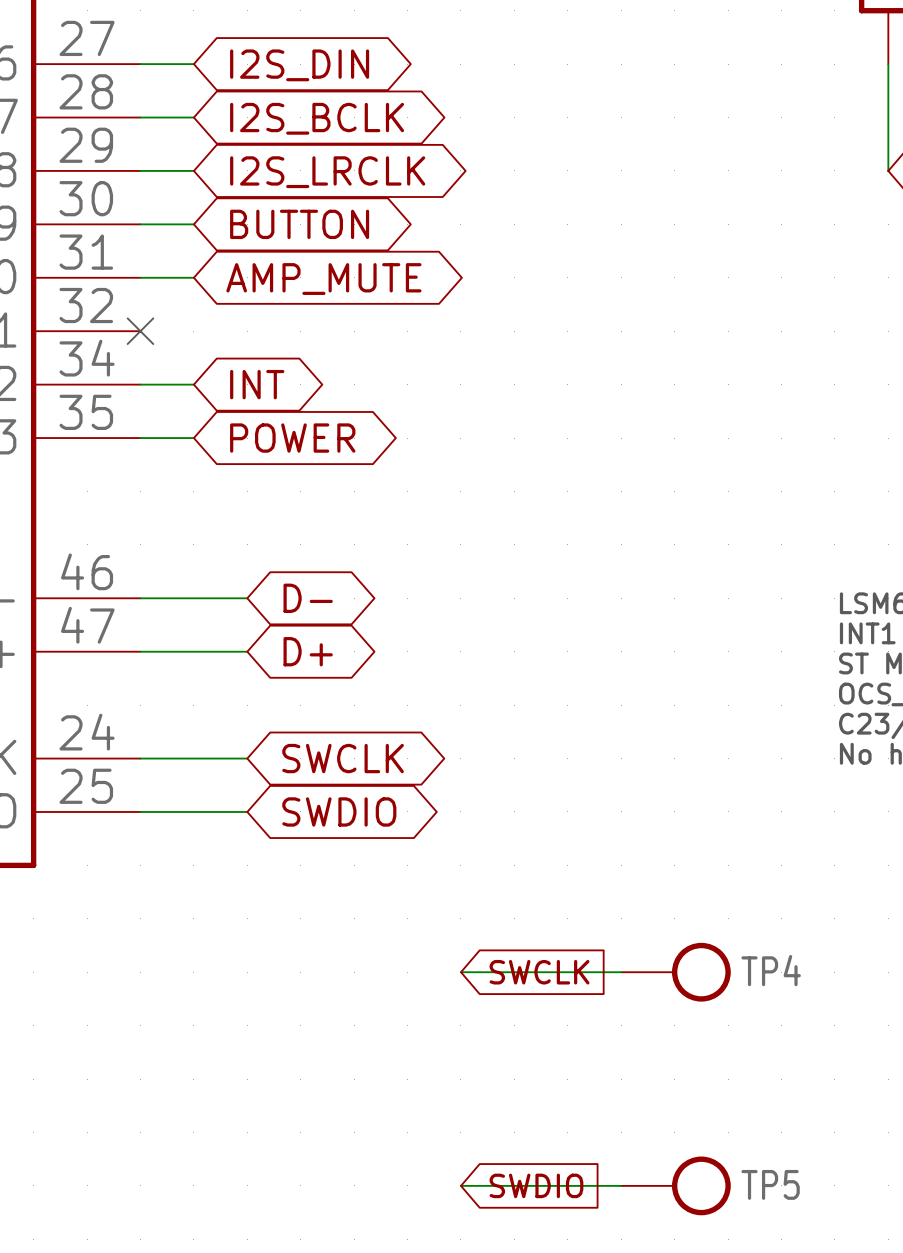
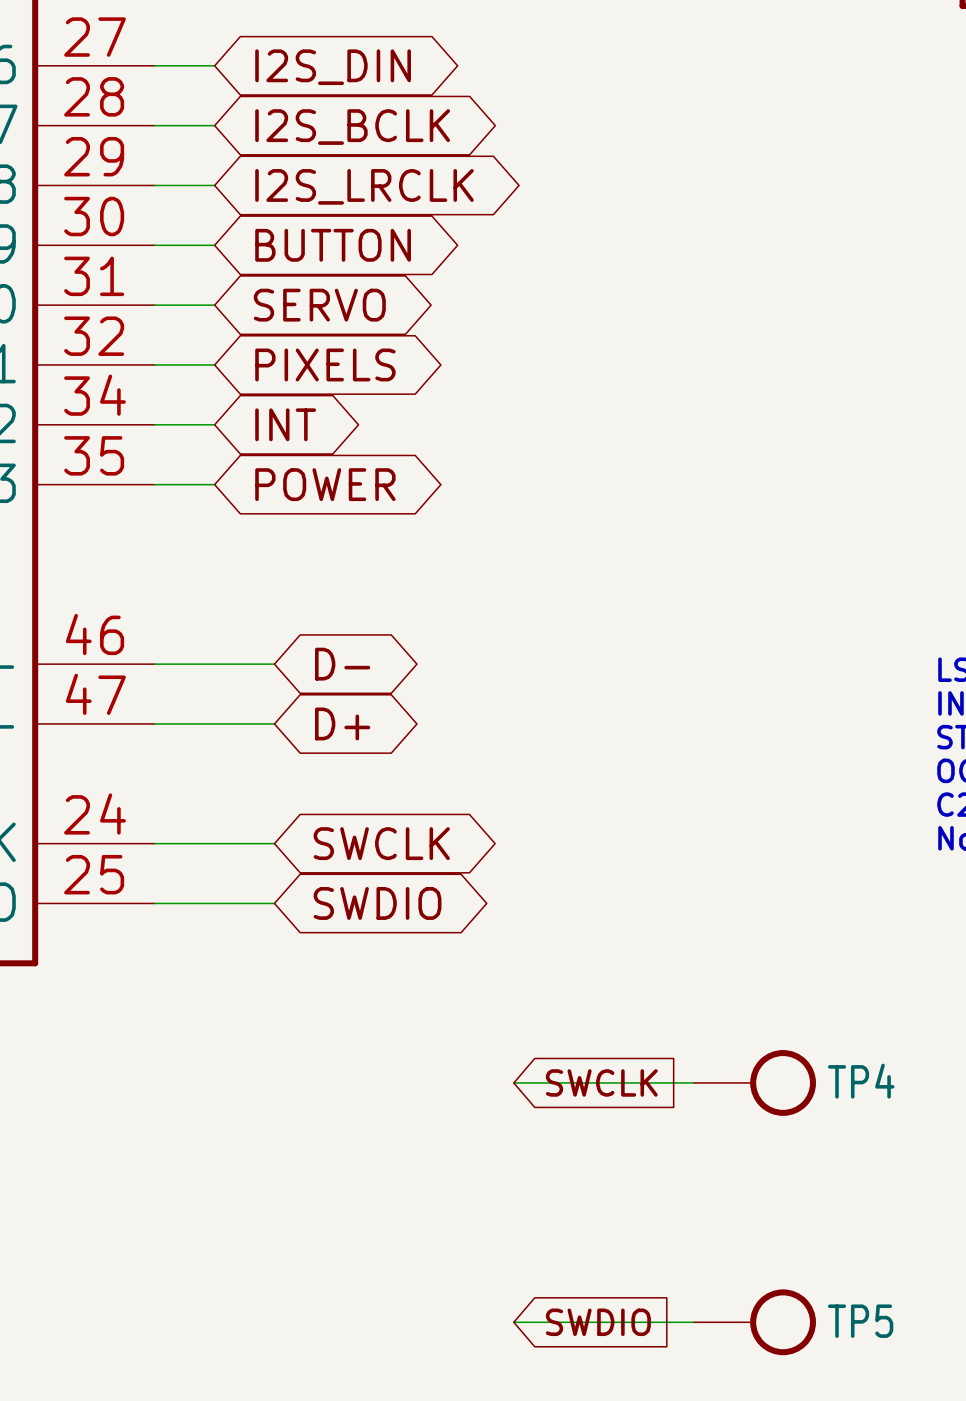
global label: AMP_MUTE (323, 279) -> SERVO (319, 305)
wire: none -> (154, 364) (214, 364)
no-connect mark: (140, 331) -> none
global label: none -> PIXELS (325, 364)

